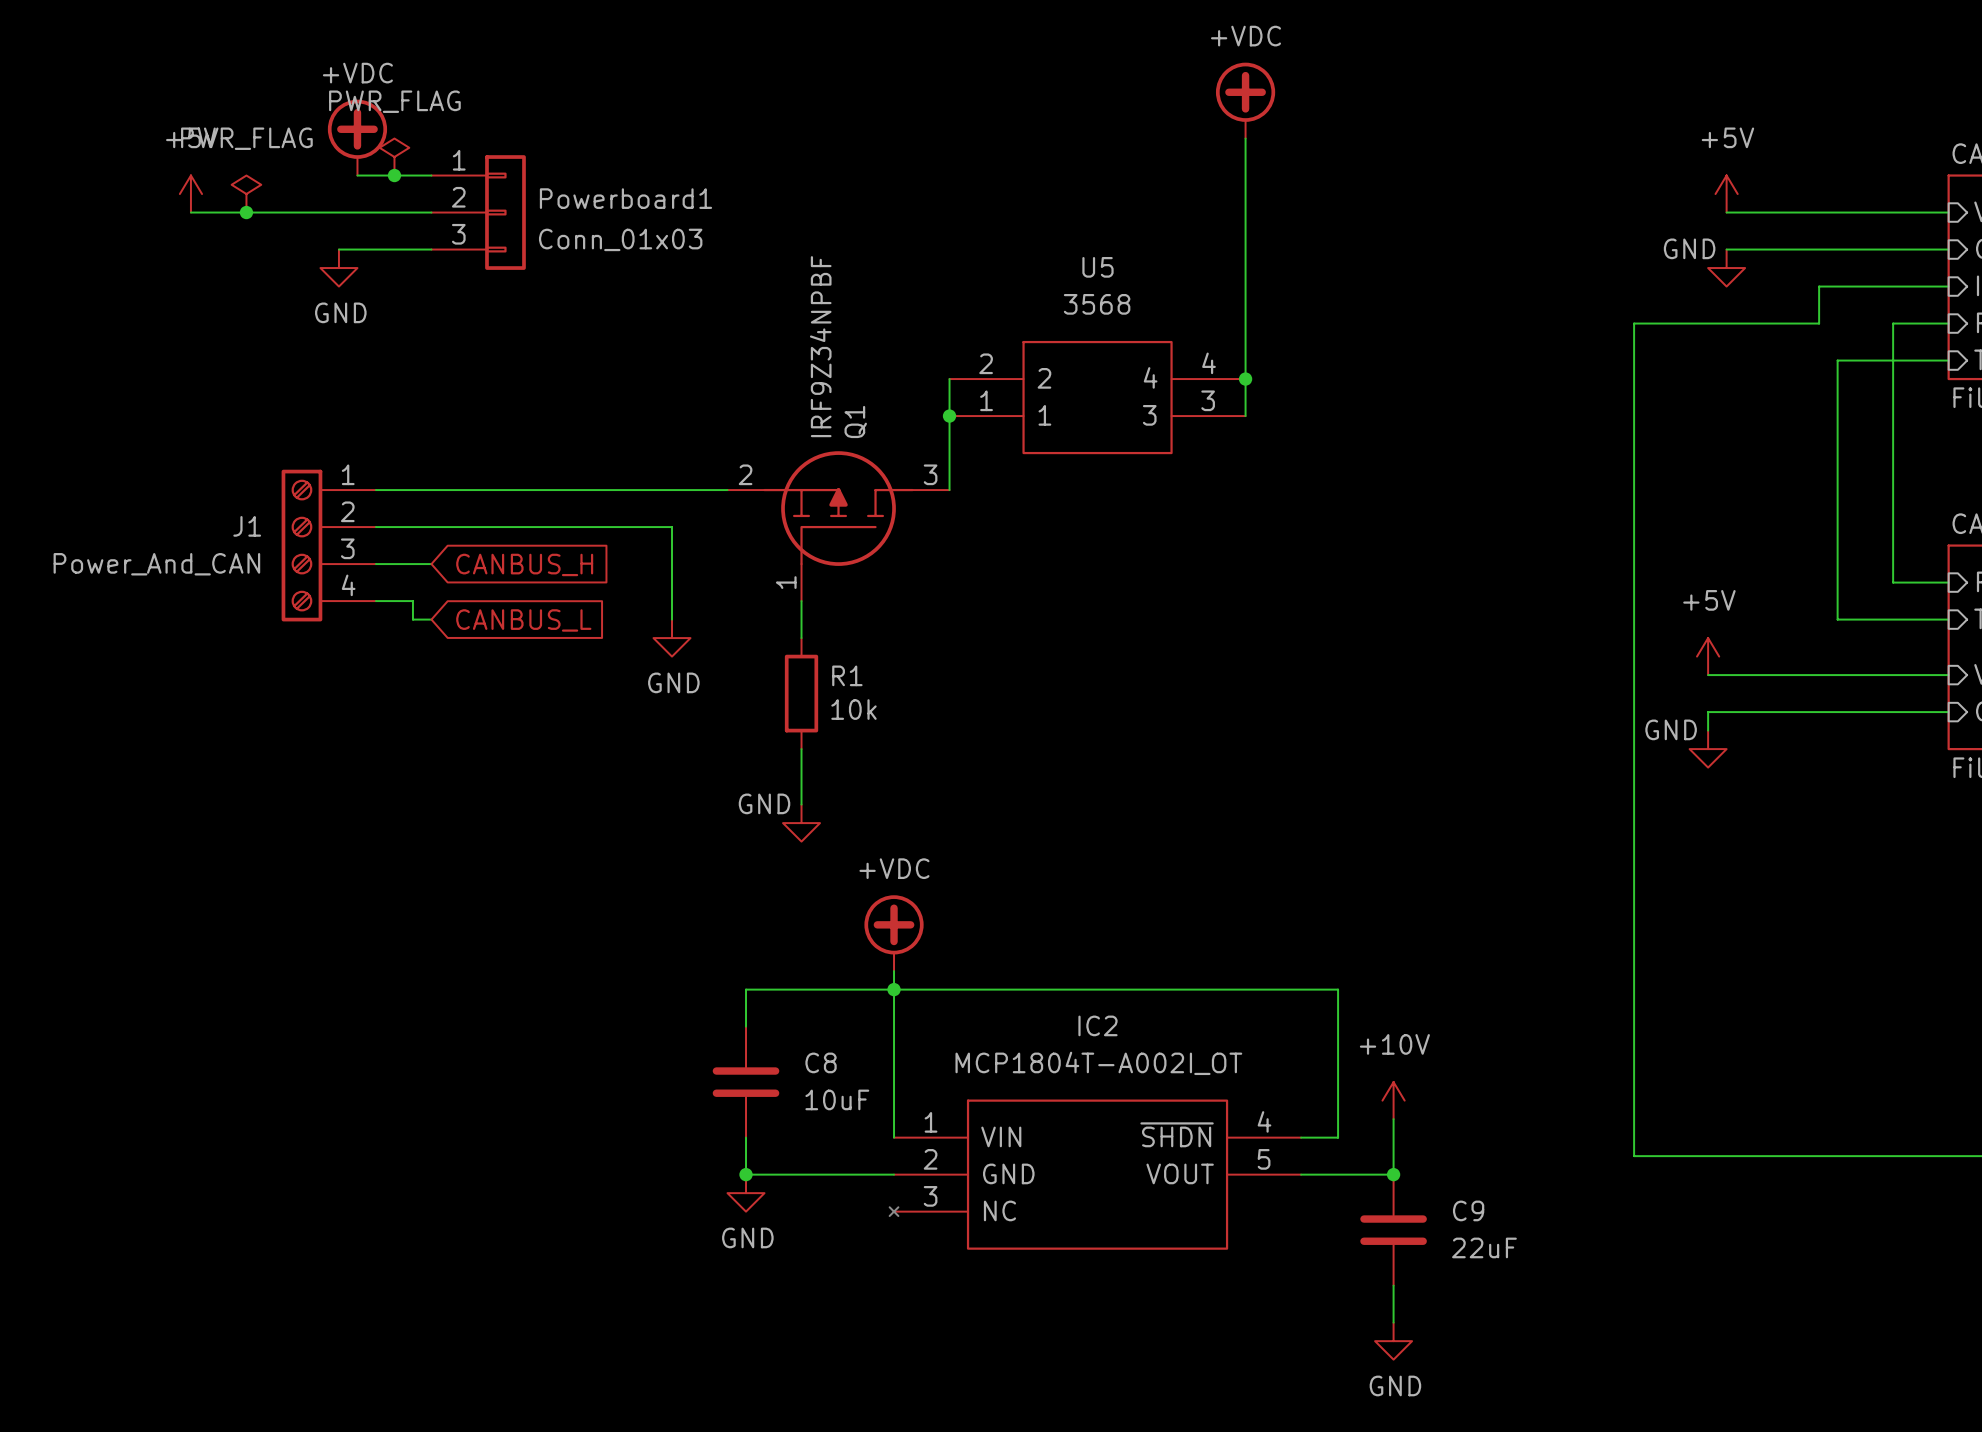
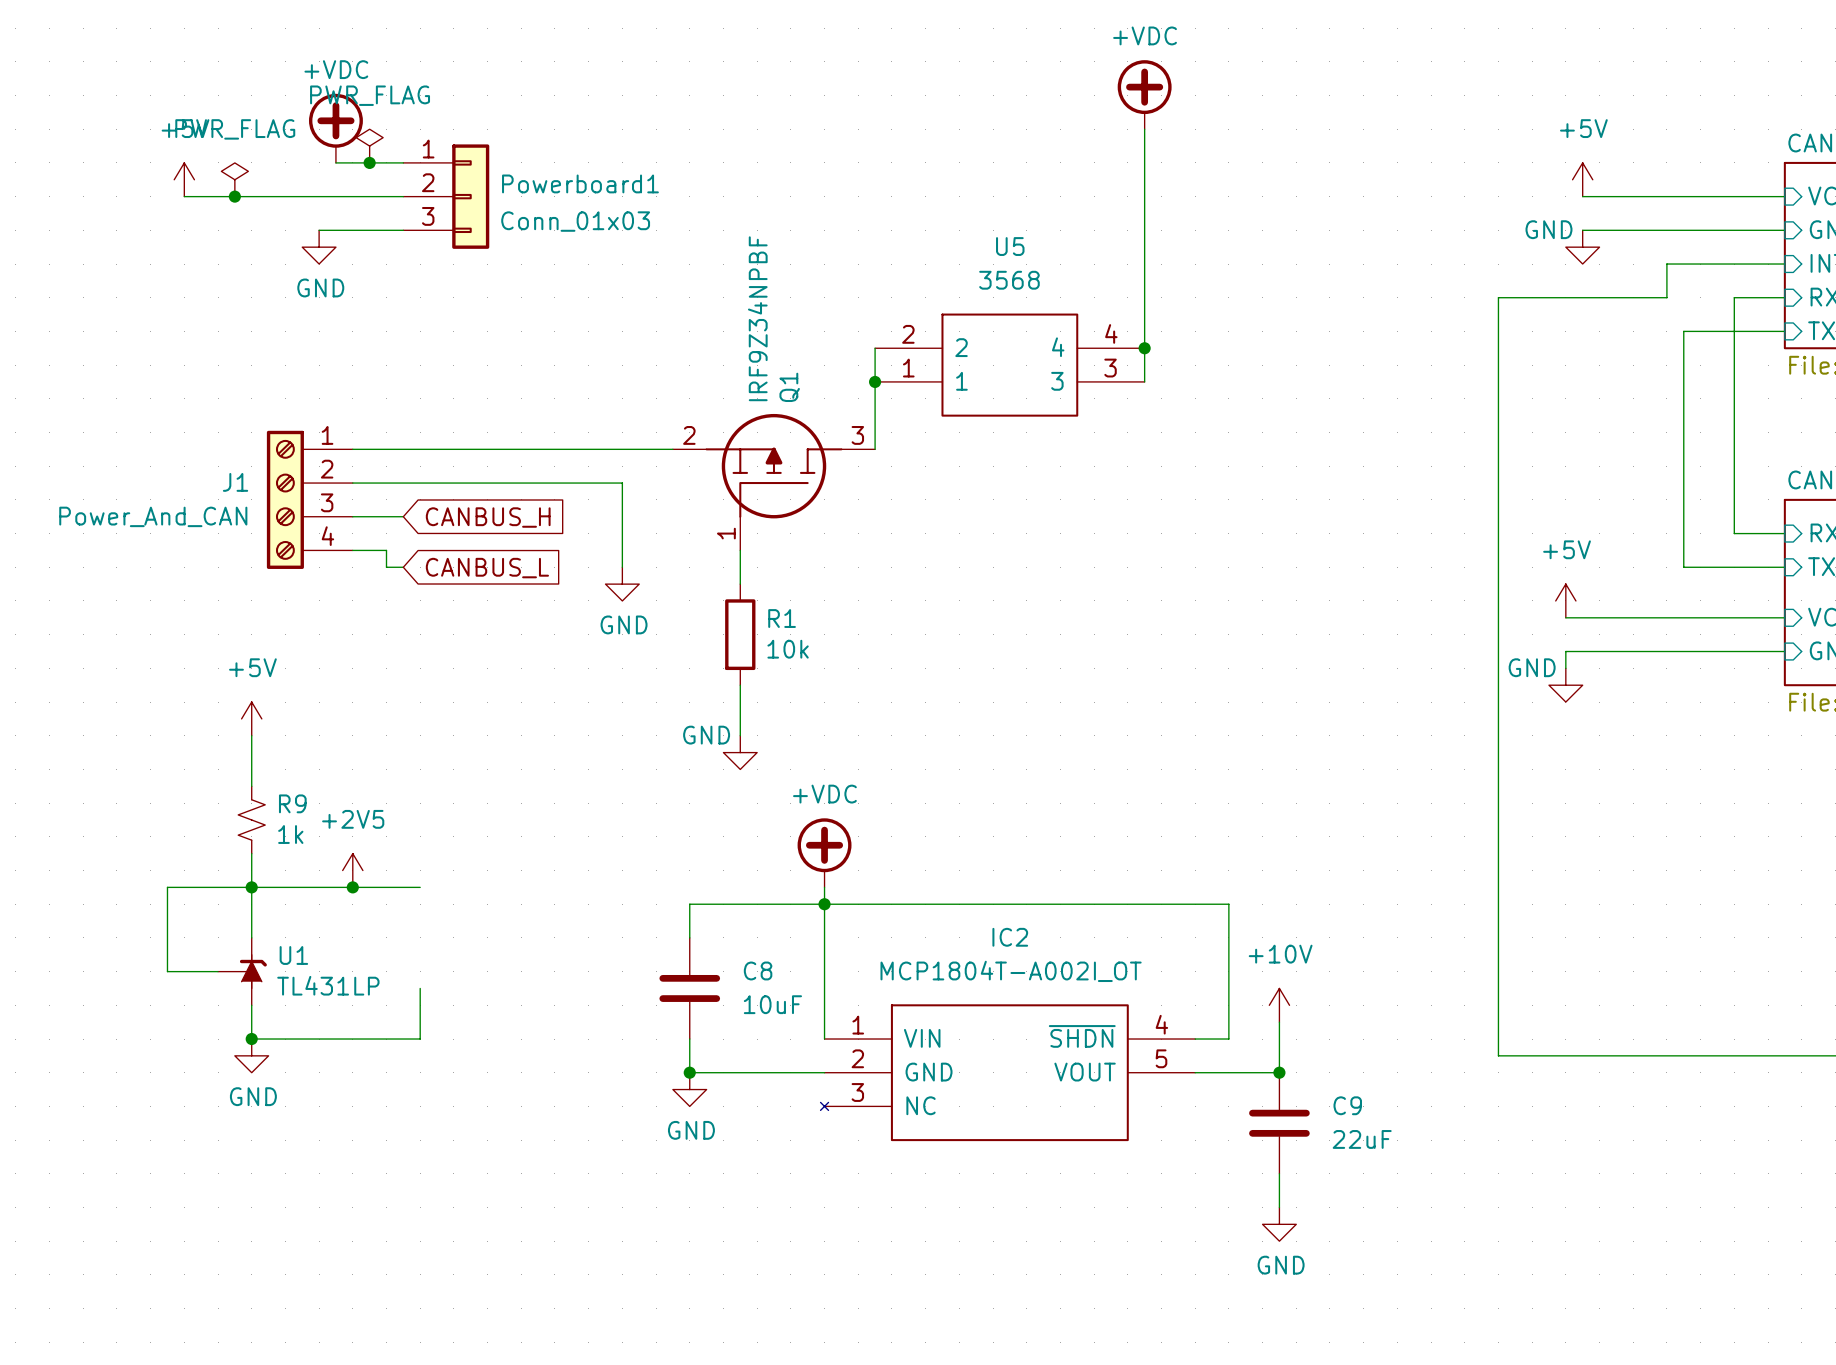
power symbol: none -> +5V (251, 718)
wire: none -> (251, 735) (251, 786)
R9: none -> 1k (251, 819)
wire: none -> (251, 853) (251, 937)
power symbol: none -> +2V5 (352, 870)
junction: none -> (251, 887)
junction: none -> (352, 887)
wire: none -> (420, 887) (167, 887) (167, 971) (218, 971)
U1: none -> TL431LP (242, 971)
wire: none -> (420, 988) (420, 1039) (251, 1039) (251, 1005)
junction: none -> (251, 1039)
power symbol: none -> GND (251, 1055)

